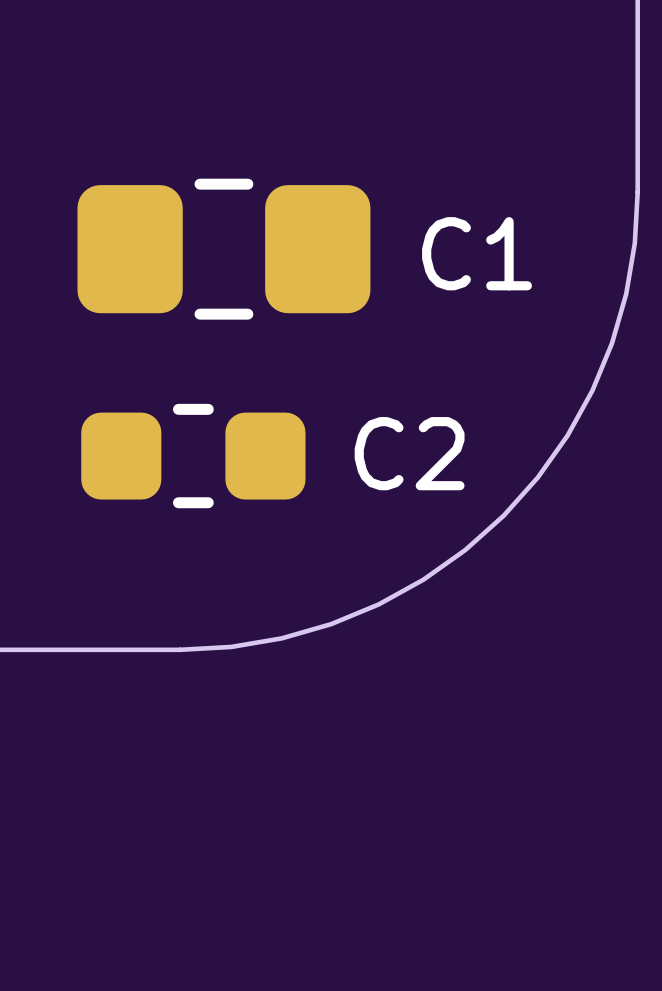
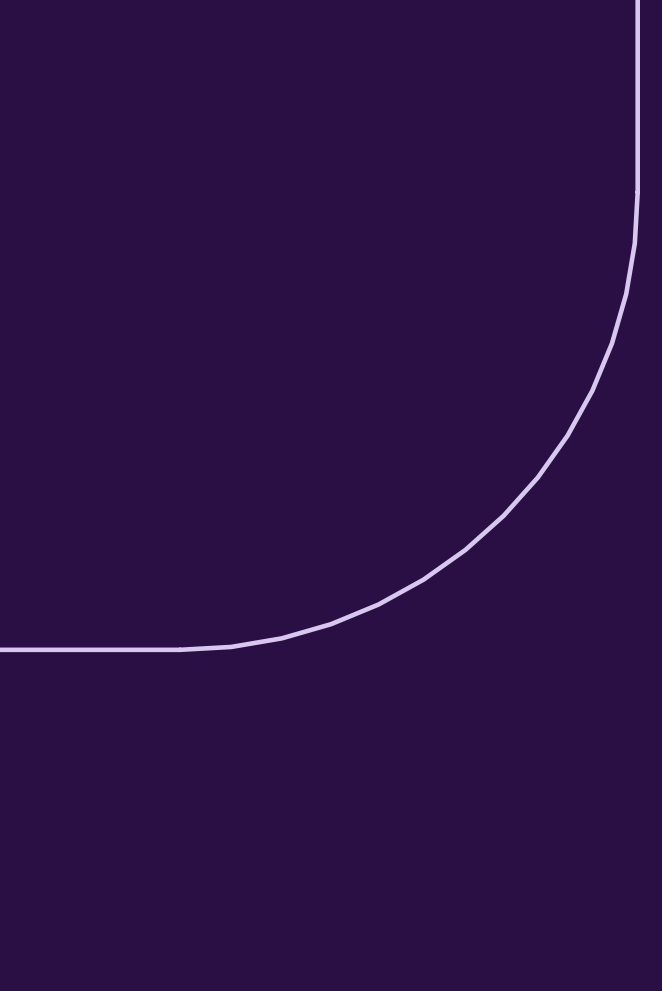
C1: (223, 249) -> none
C2: (193, 456) -> none

